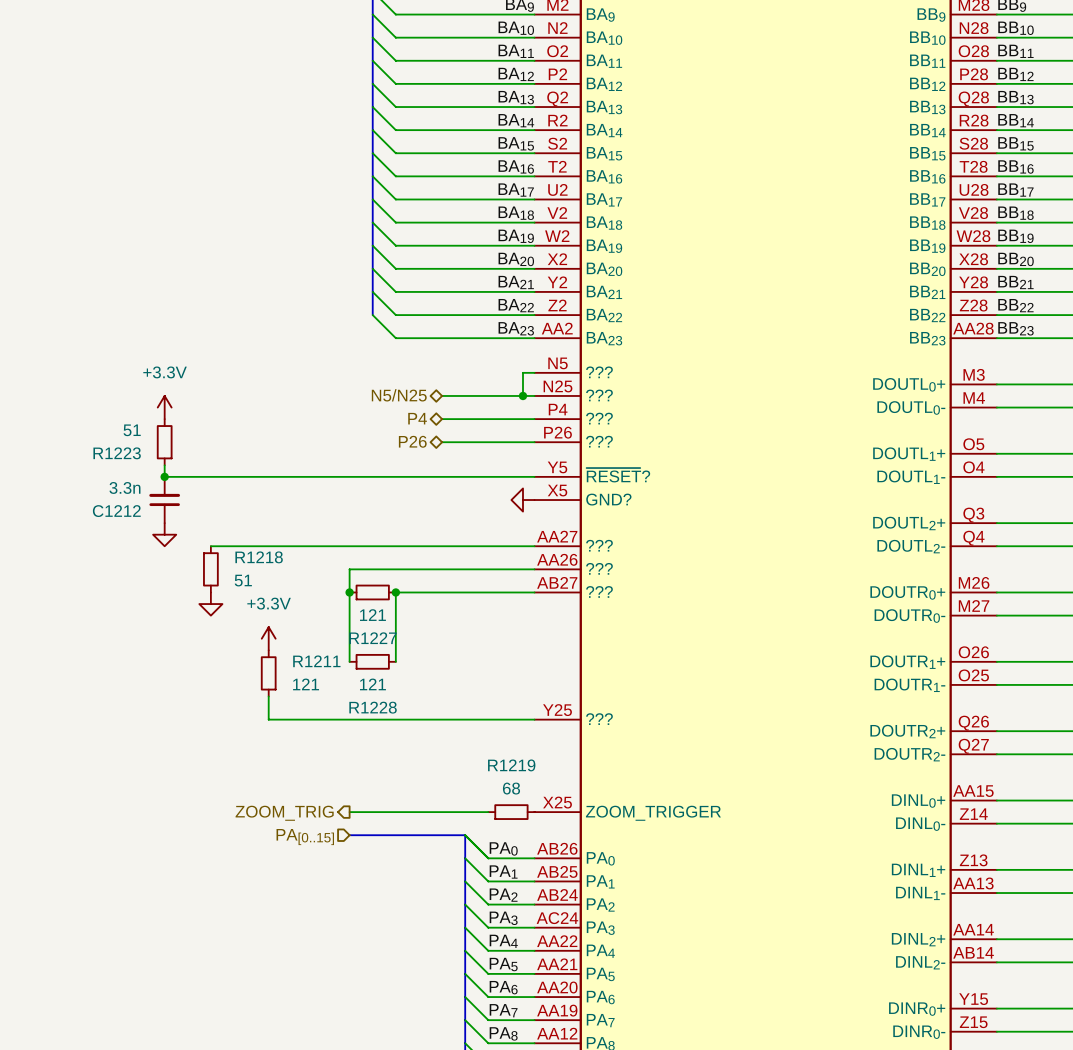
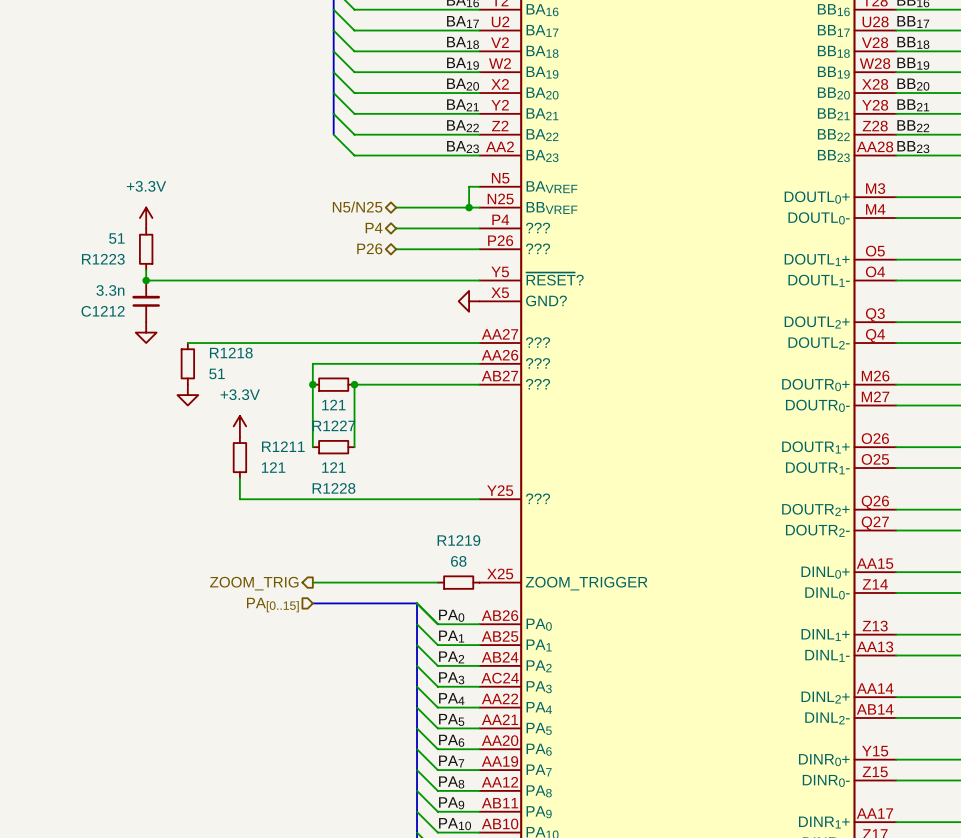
part pin name: ??? (599, 372) -> BAVREF (551, 187)
part pin name: ??? (599, 395) -> BBVREF (551, 207)

